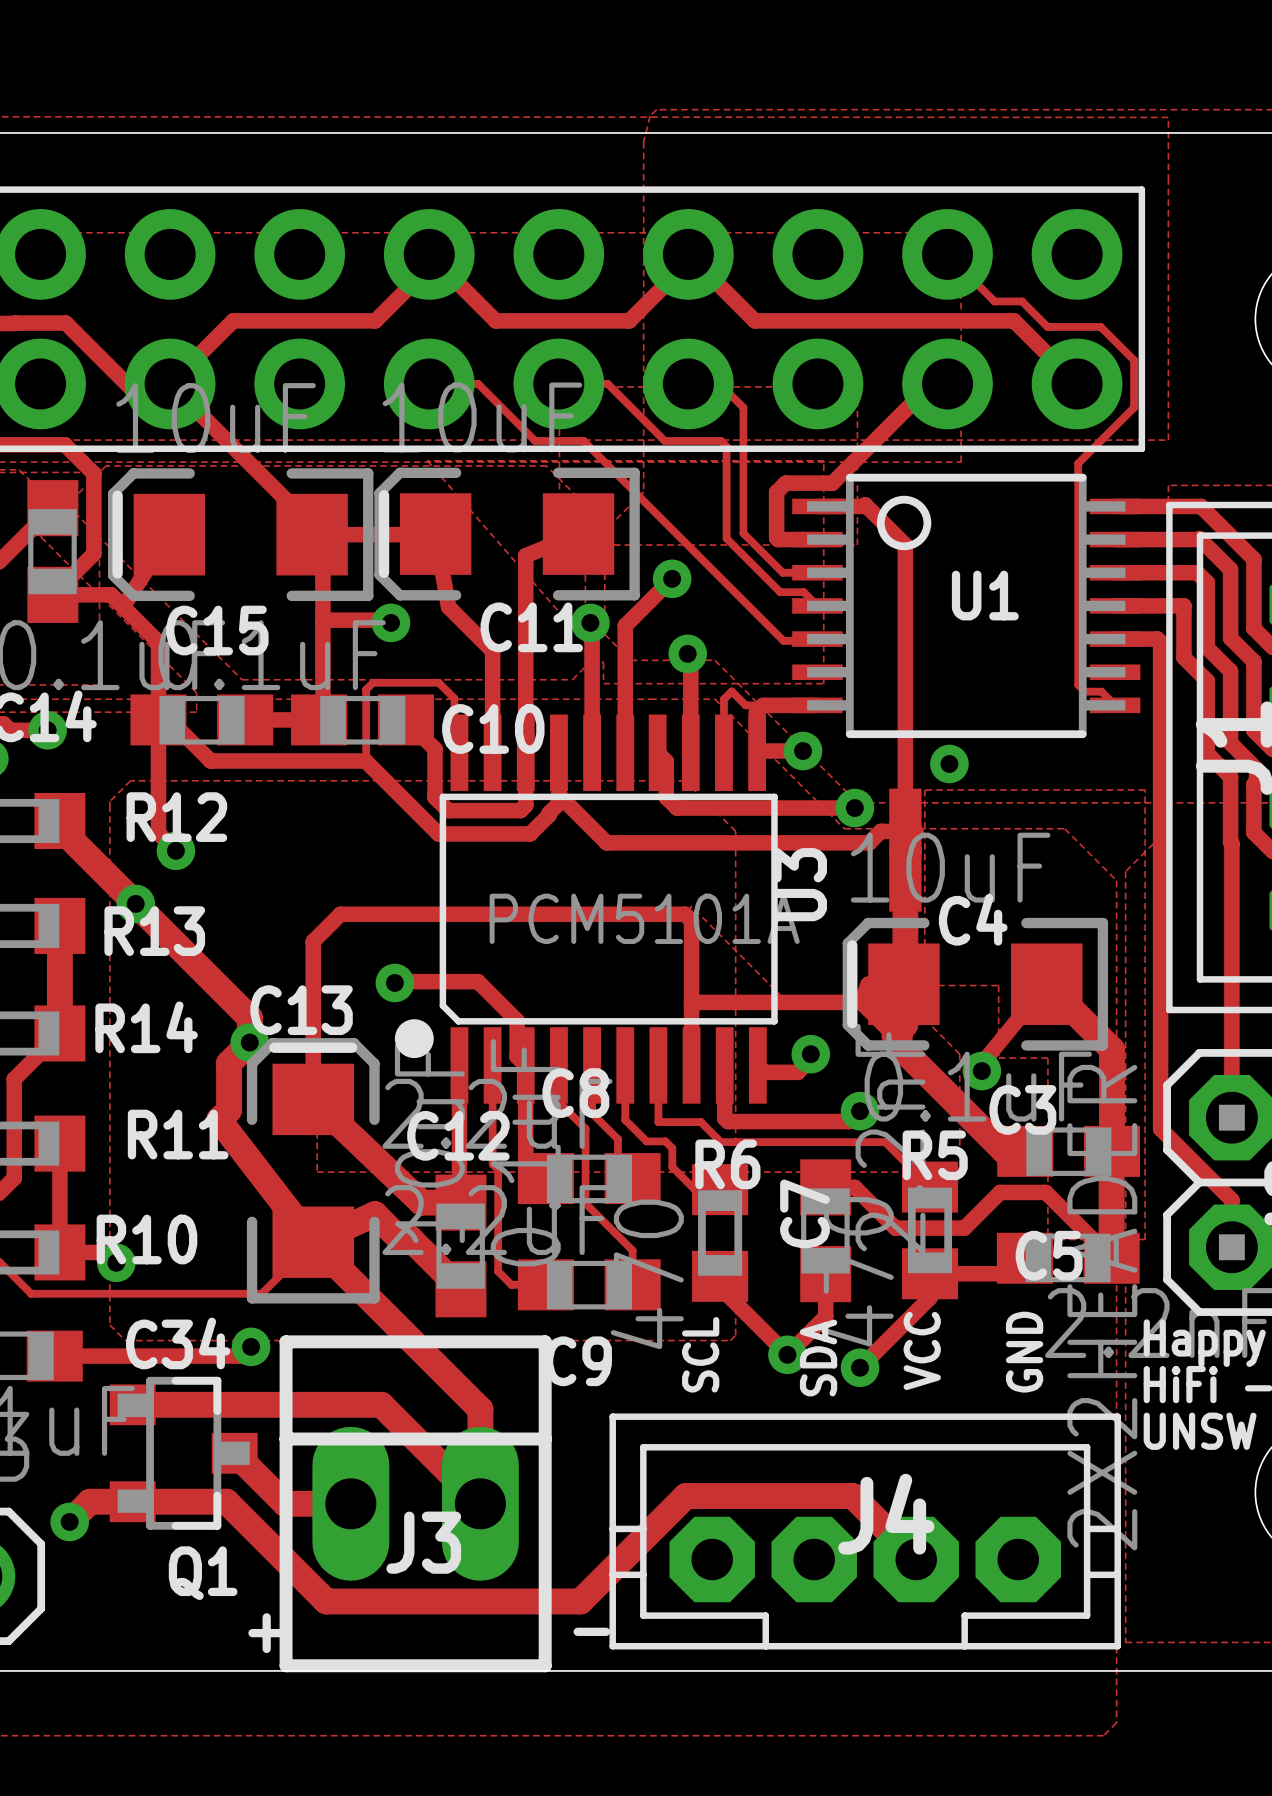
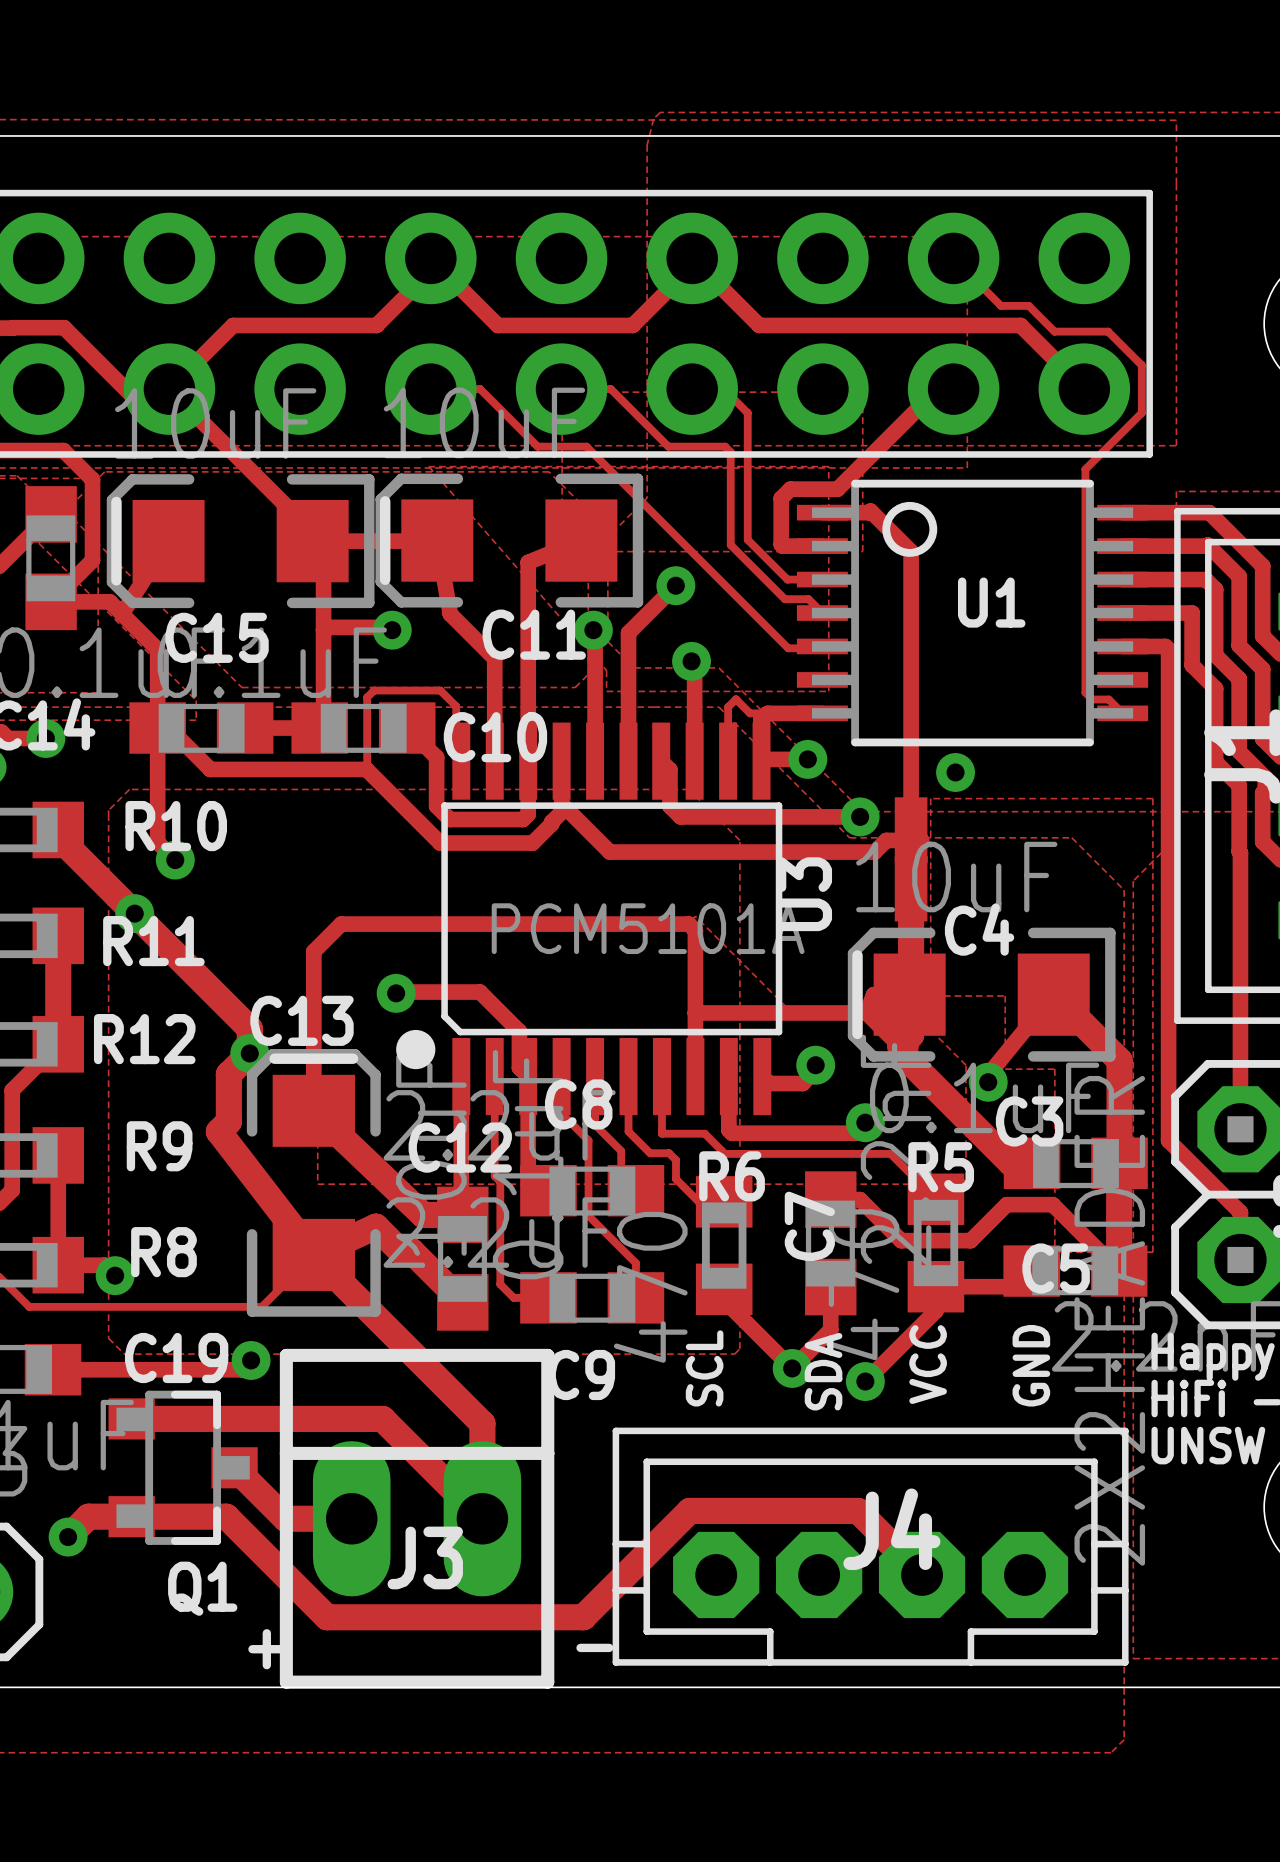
R12 name: R12 (176, 817) -> R10 (176, 826)
R13 name: R13 (154, 931) -> R11 (153, 941)
R14 name: R14 (146, 1027) -> R12 (144, 1039)
R11 name: R11 (178, 1134) -> R9 (159, 1146)
R10 name: R10 (146, 1239) -> R8 (163, 1252)
C34 name: C34 (178, 1343) -> C19 (176, 1358)

